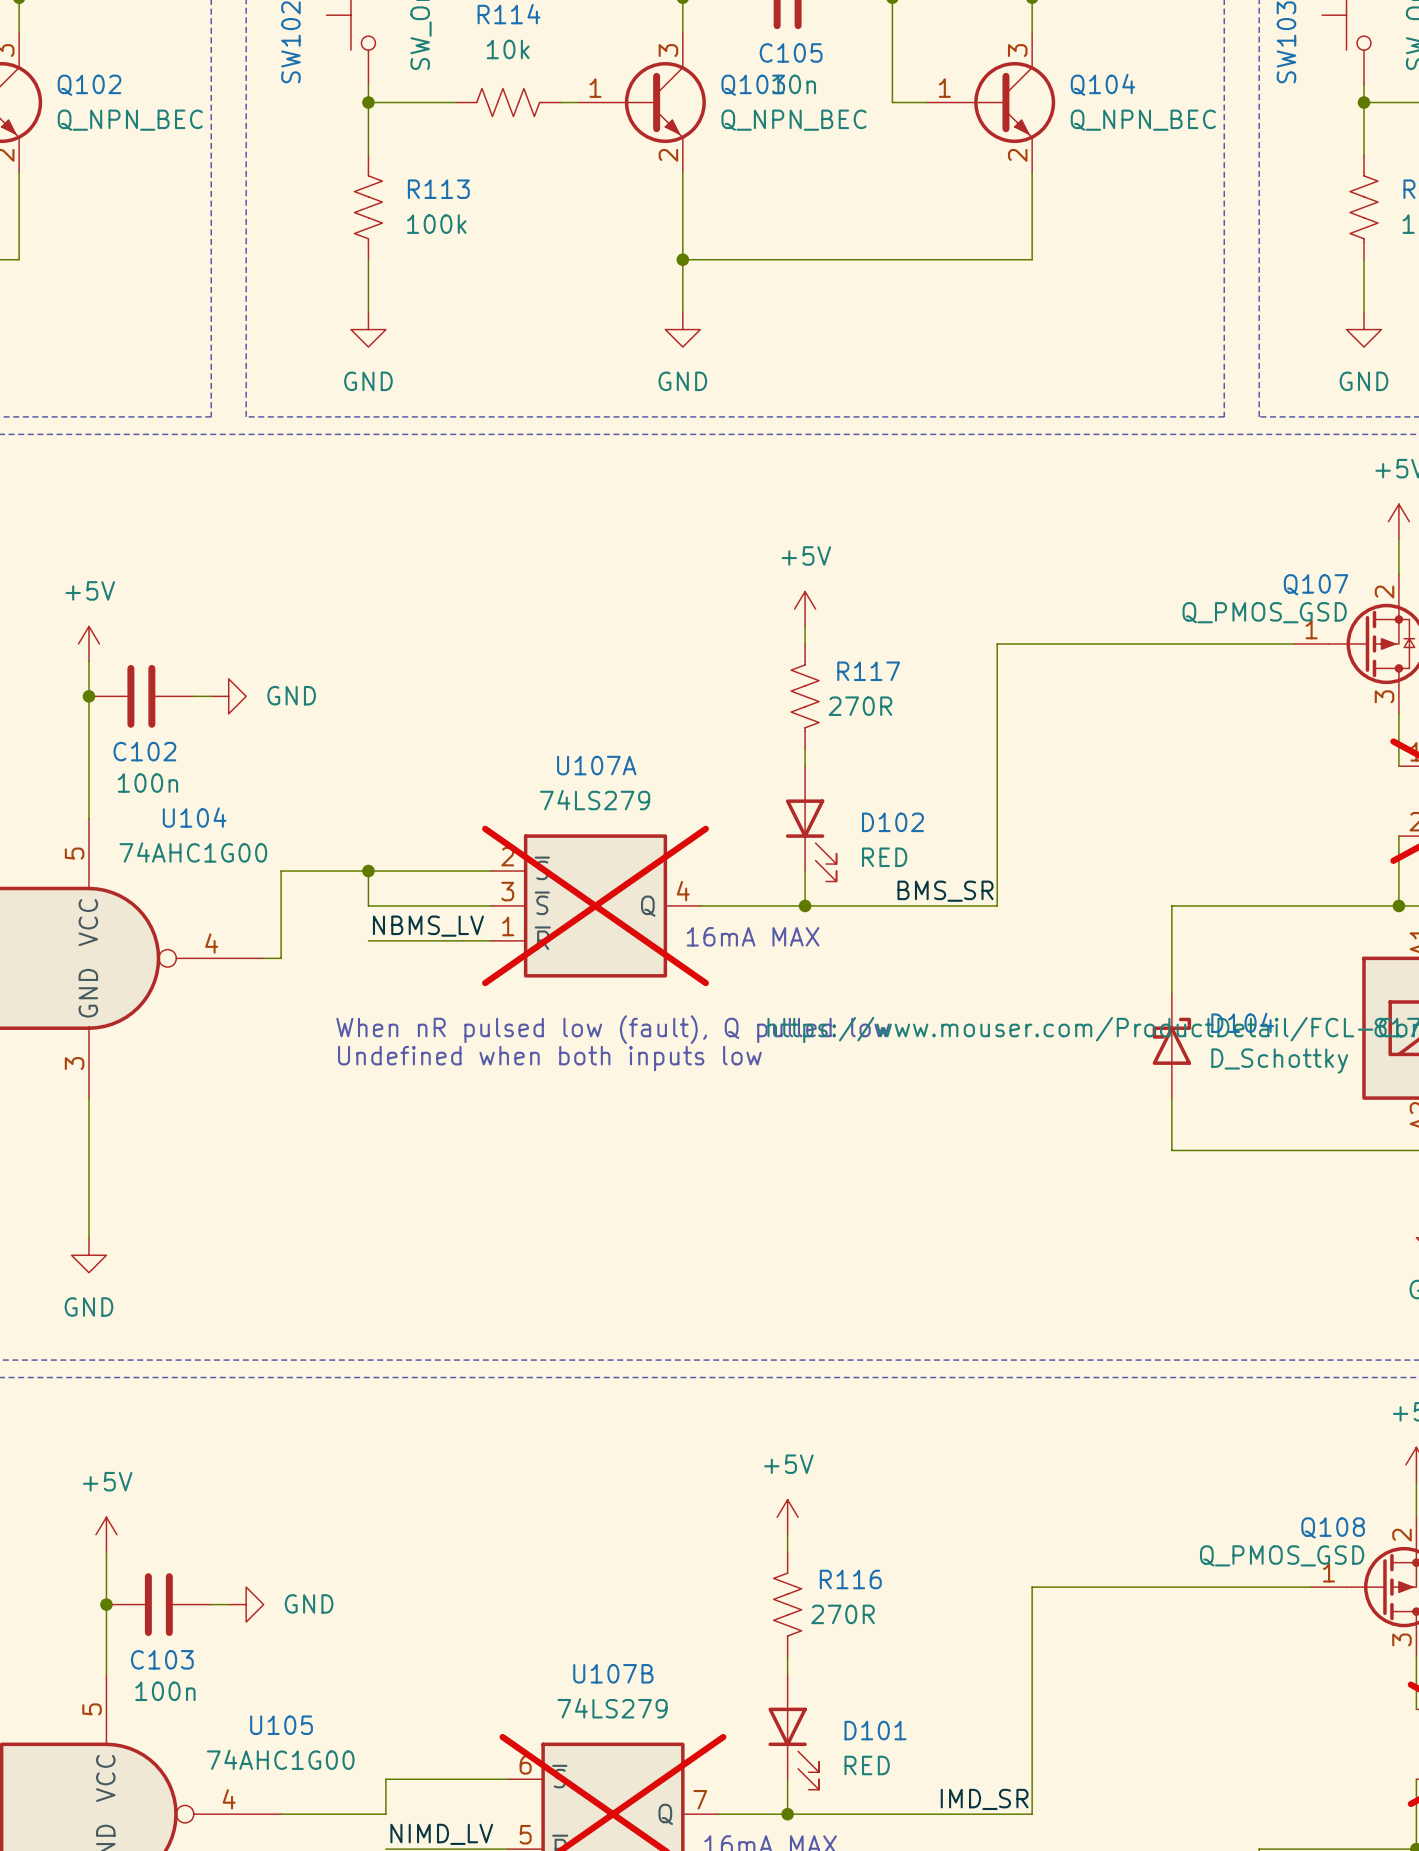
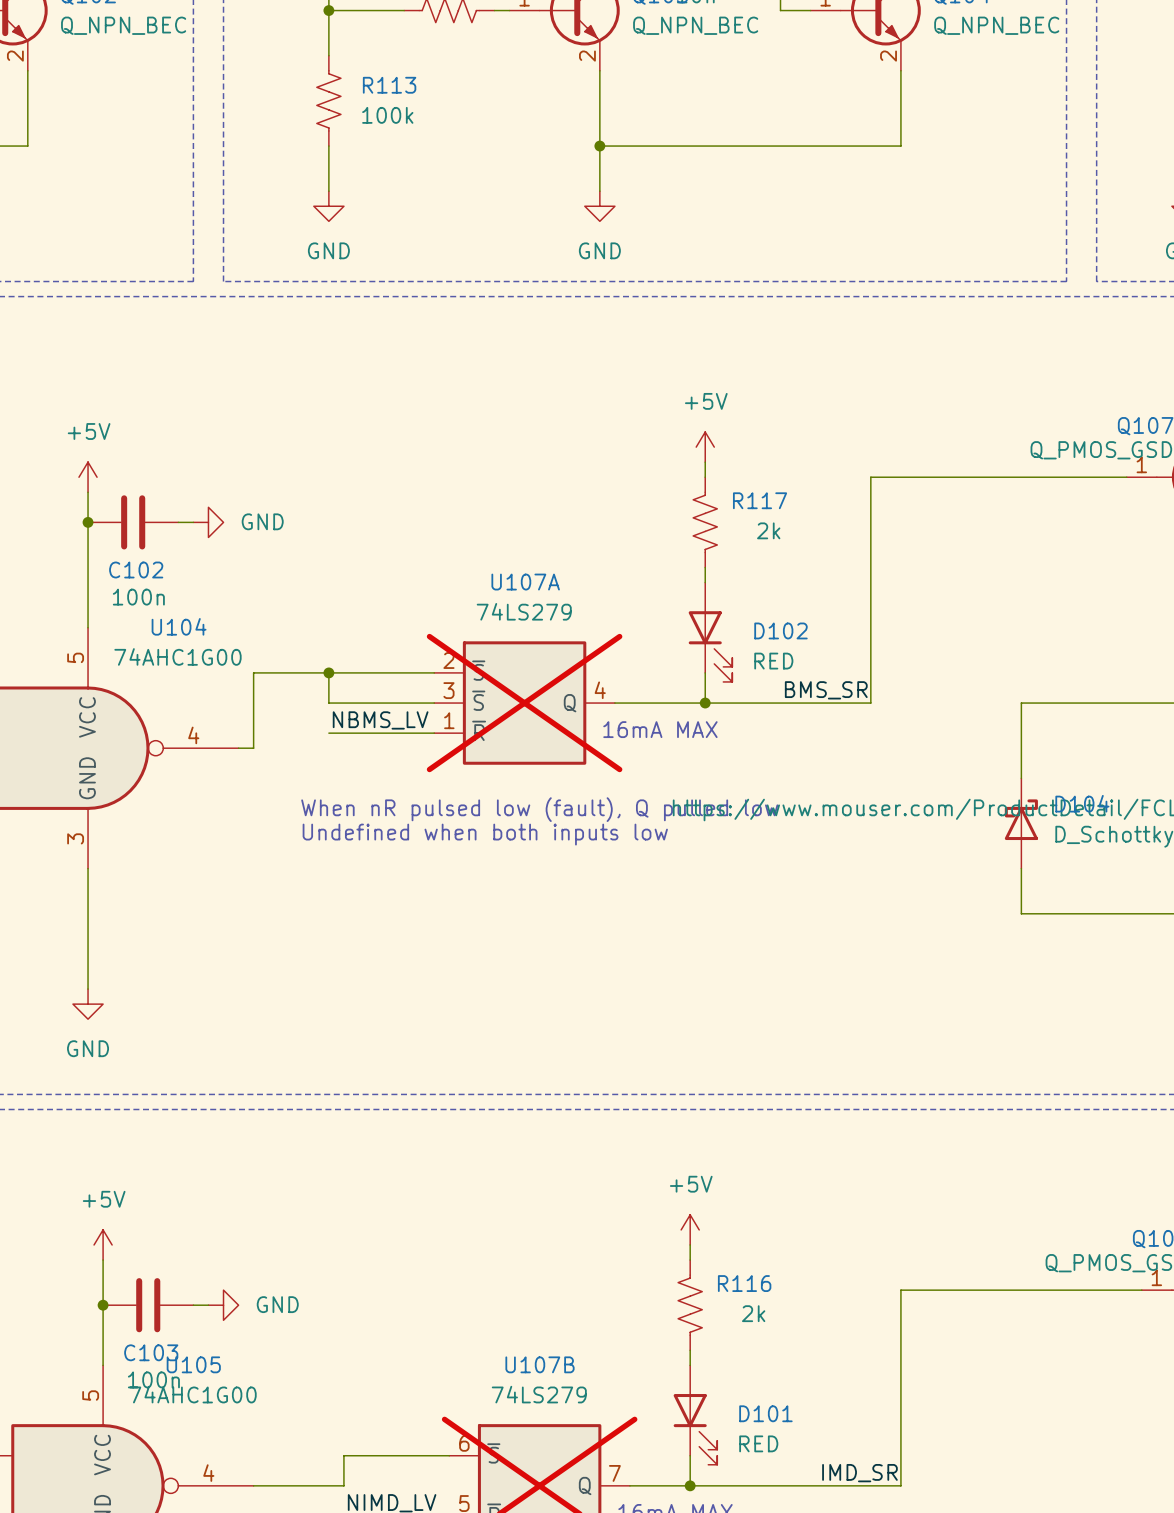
R117 value: 270R (860, 706) -> 2k (768, 530)
R116 value: 270R (842, 1614) -> 2k (753, 1313)
U105 name position: U105 (281, 1725) -> U105 (193, 1364)
U105 value position: 74AHC1G00 (280, 1759) -> 74AHC1G00 (193, 1394)

